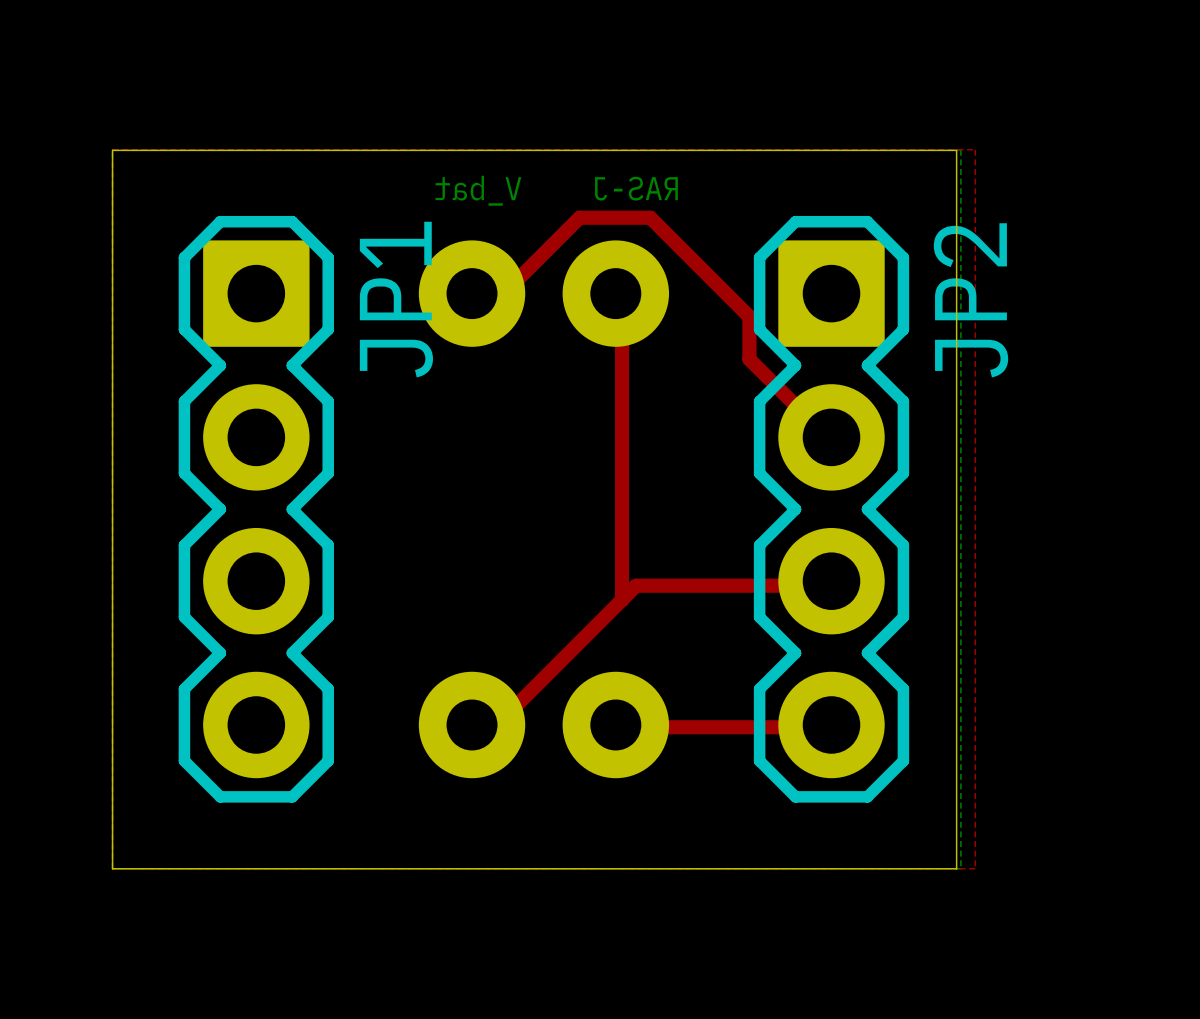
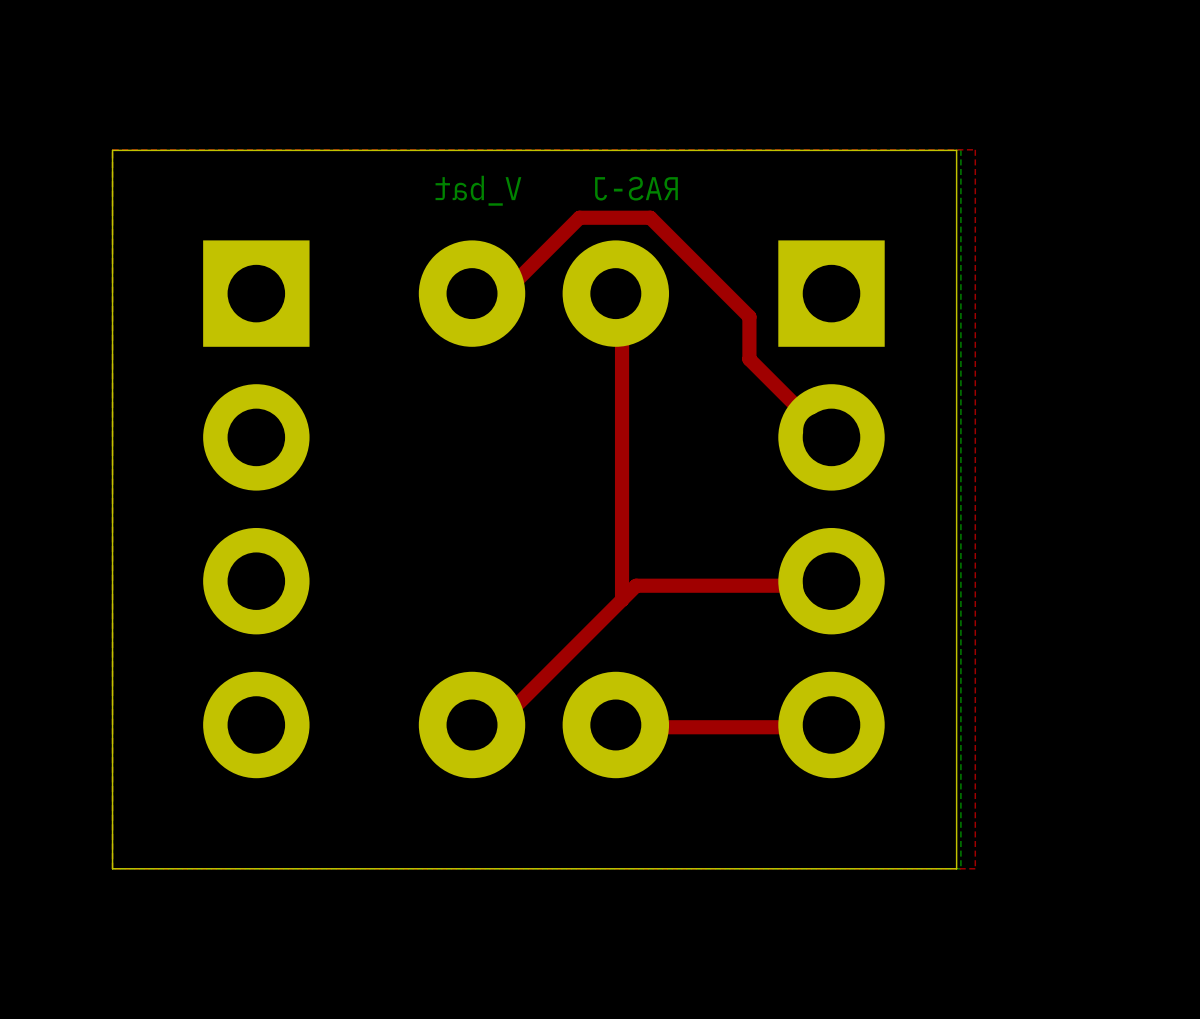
JP1 side: top (256, 509) -> bottom (256, 509)
JP2 side: top (831, 509) -> bottom (831, 509)

